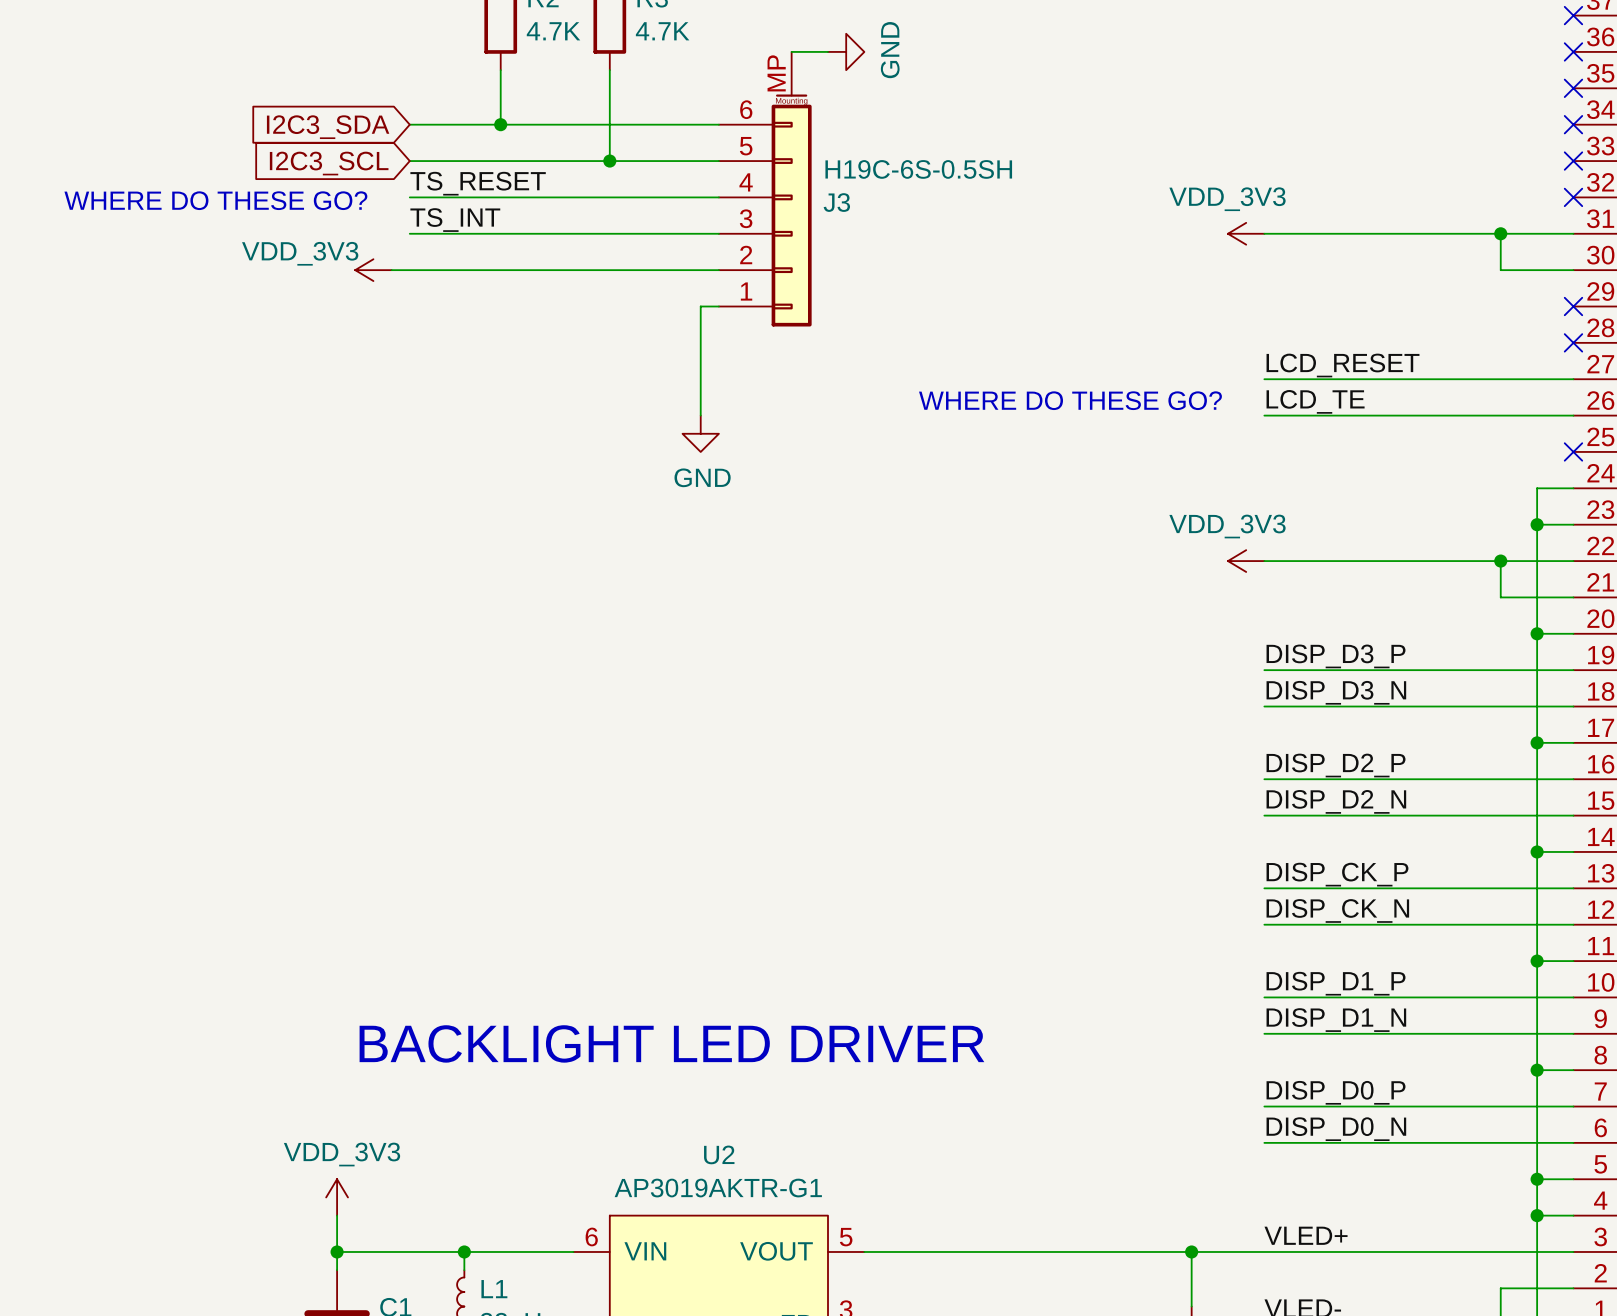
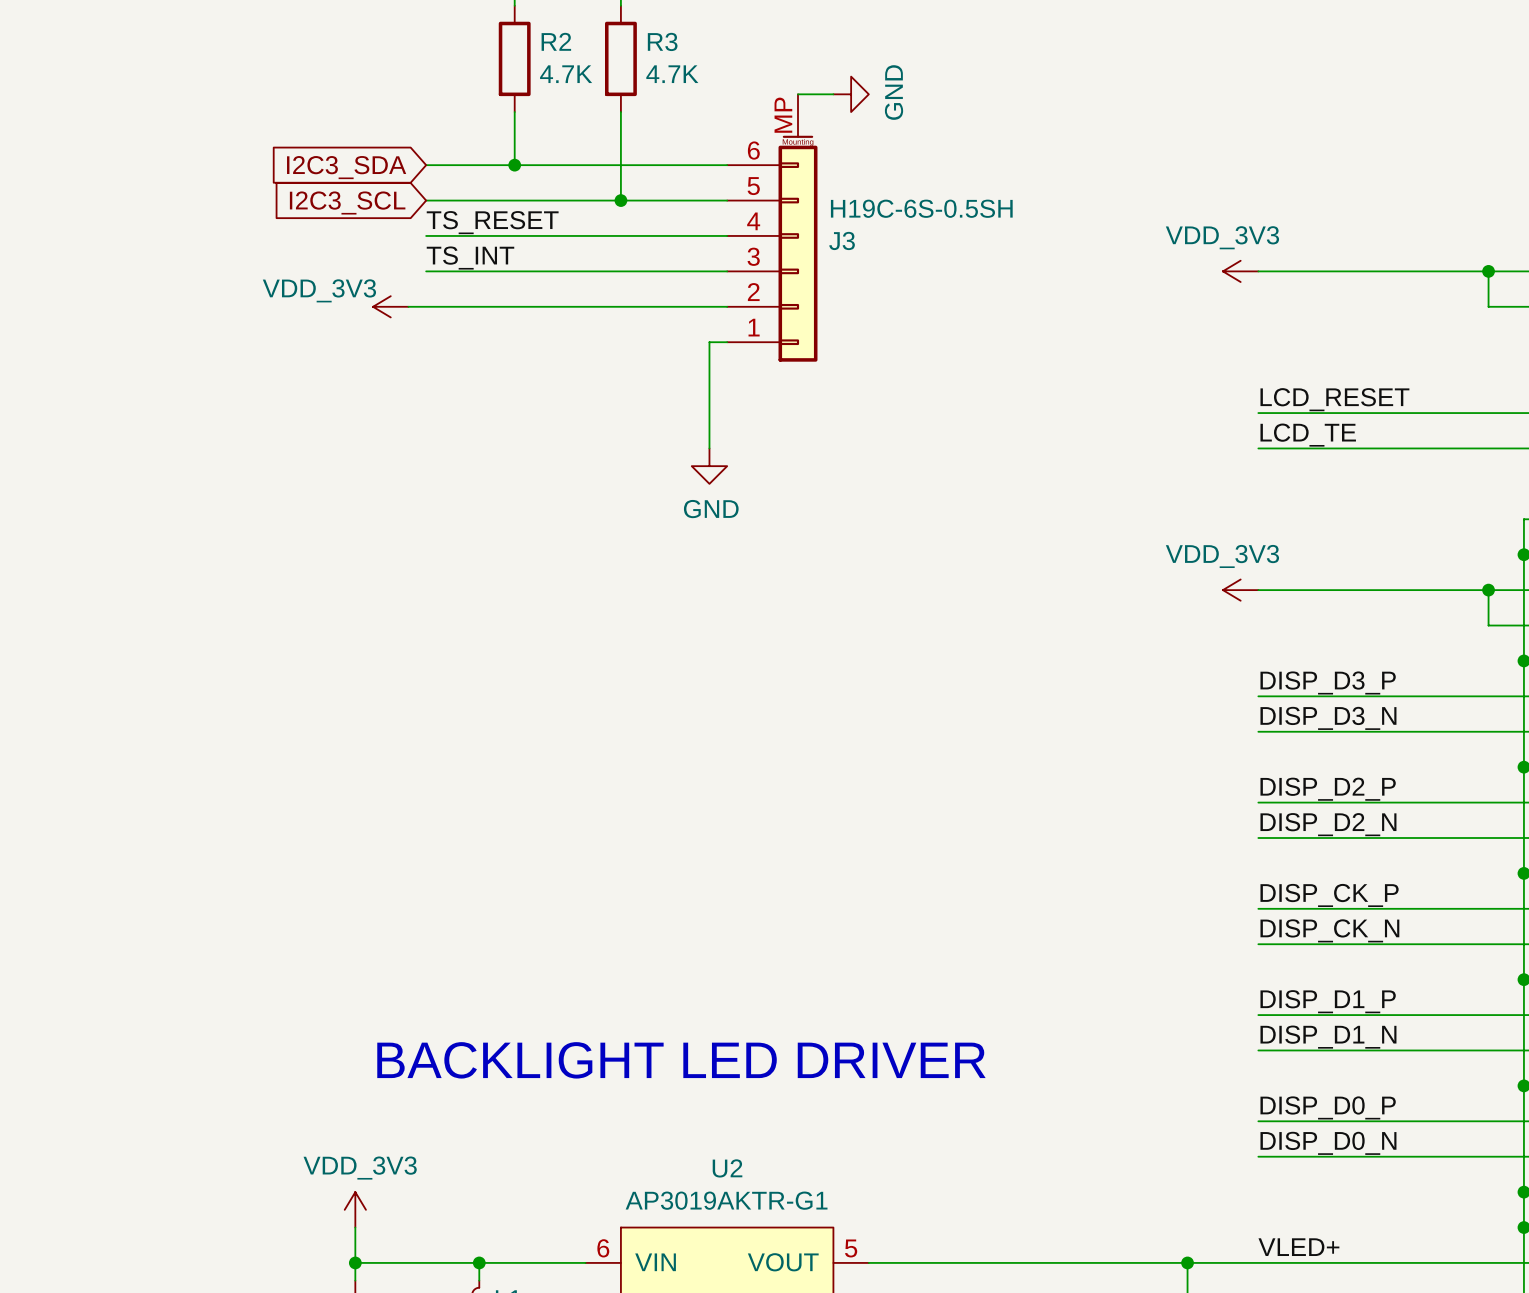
text: WHERE DO THESE GO? (215, 200) -> none
text: WHERE DO THESE GO? (1070, 400) -> none

